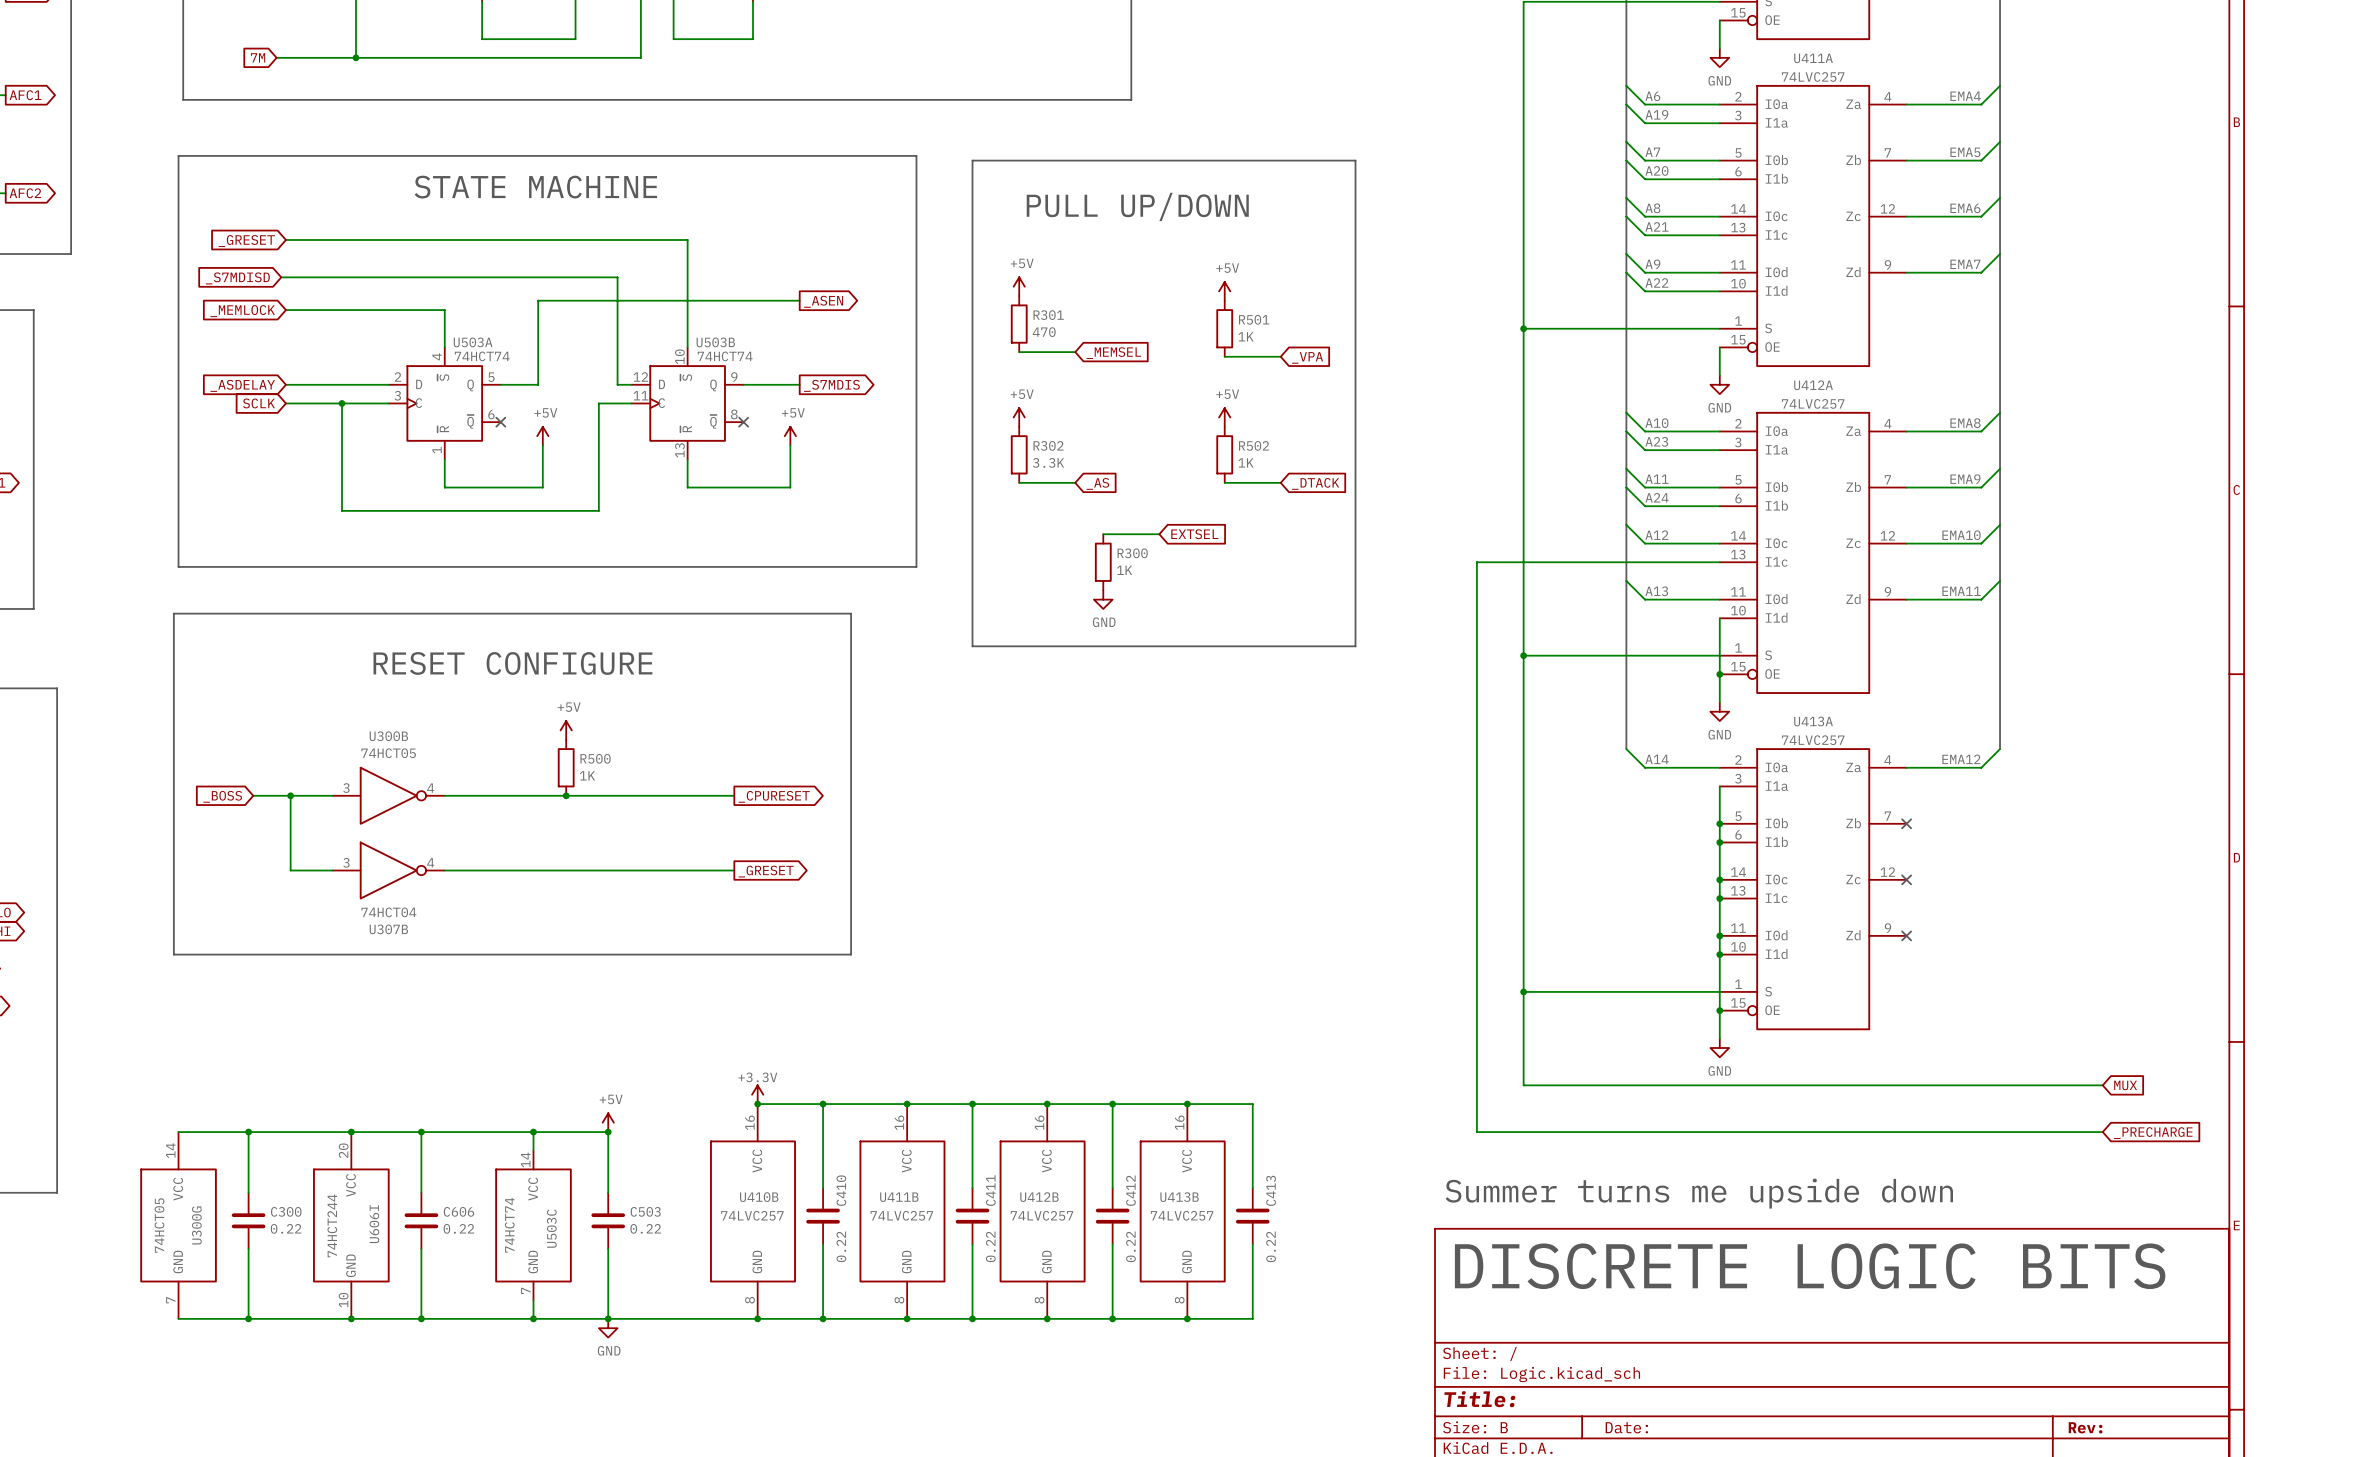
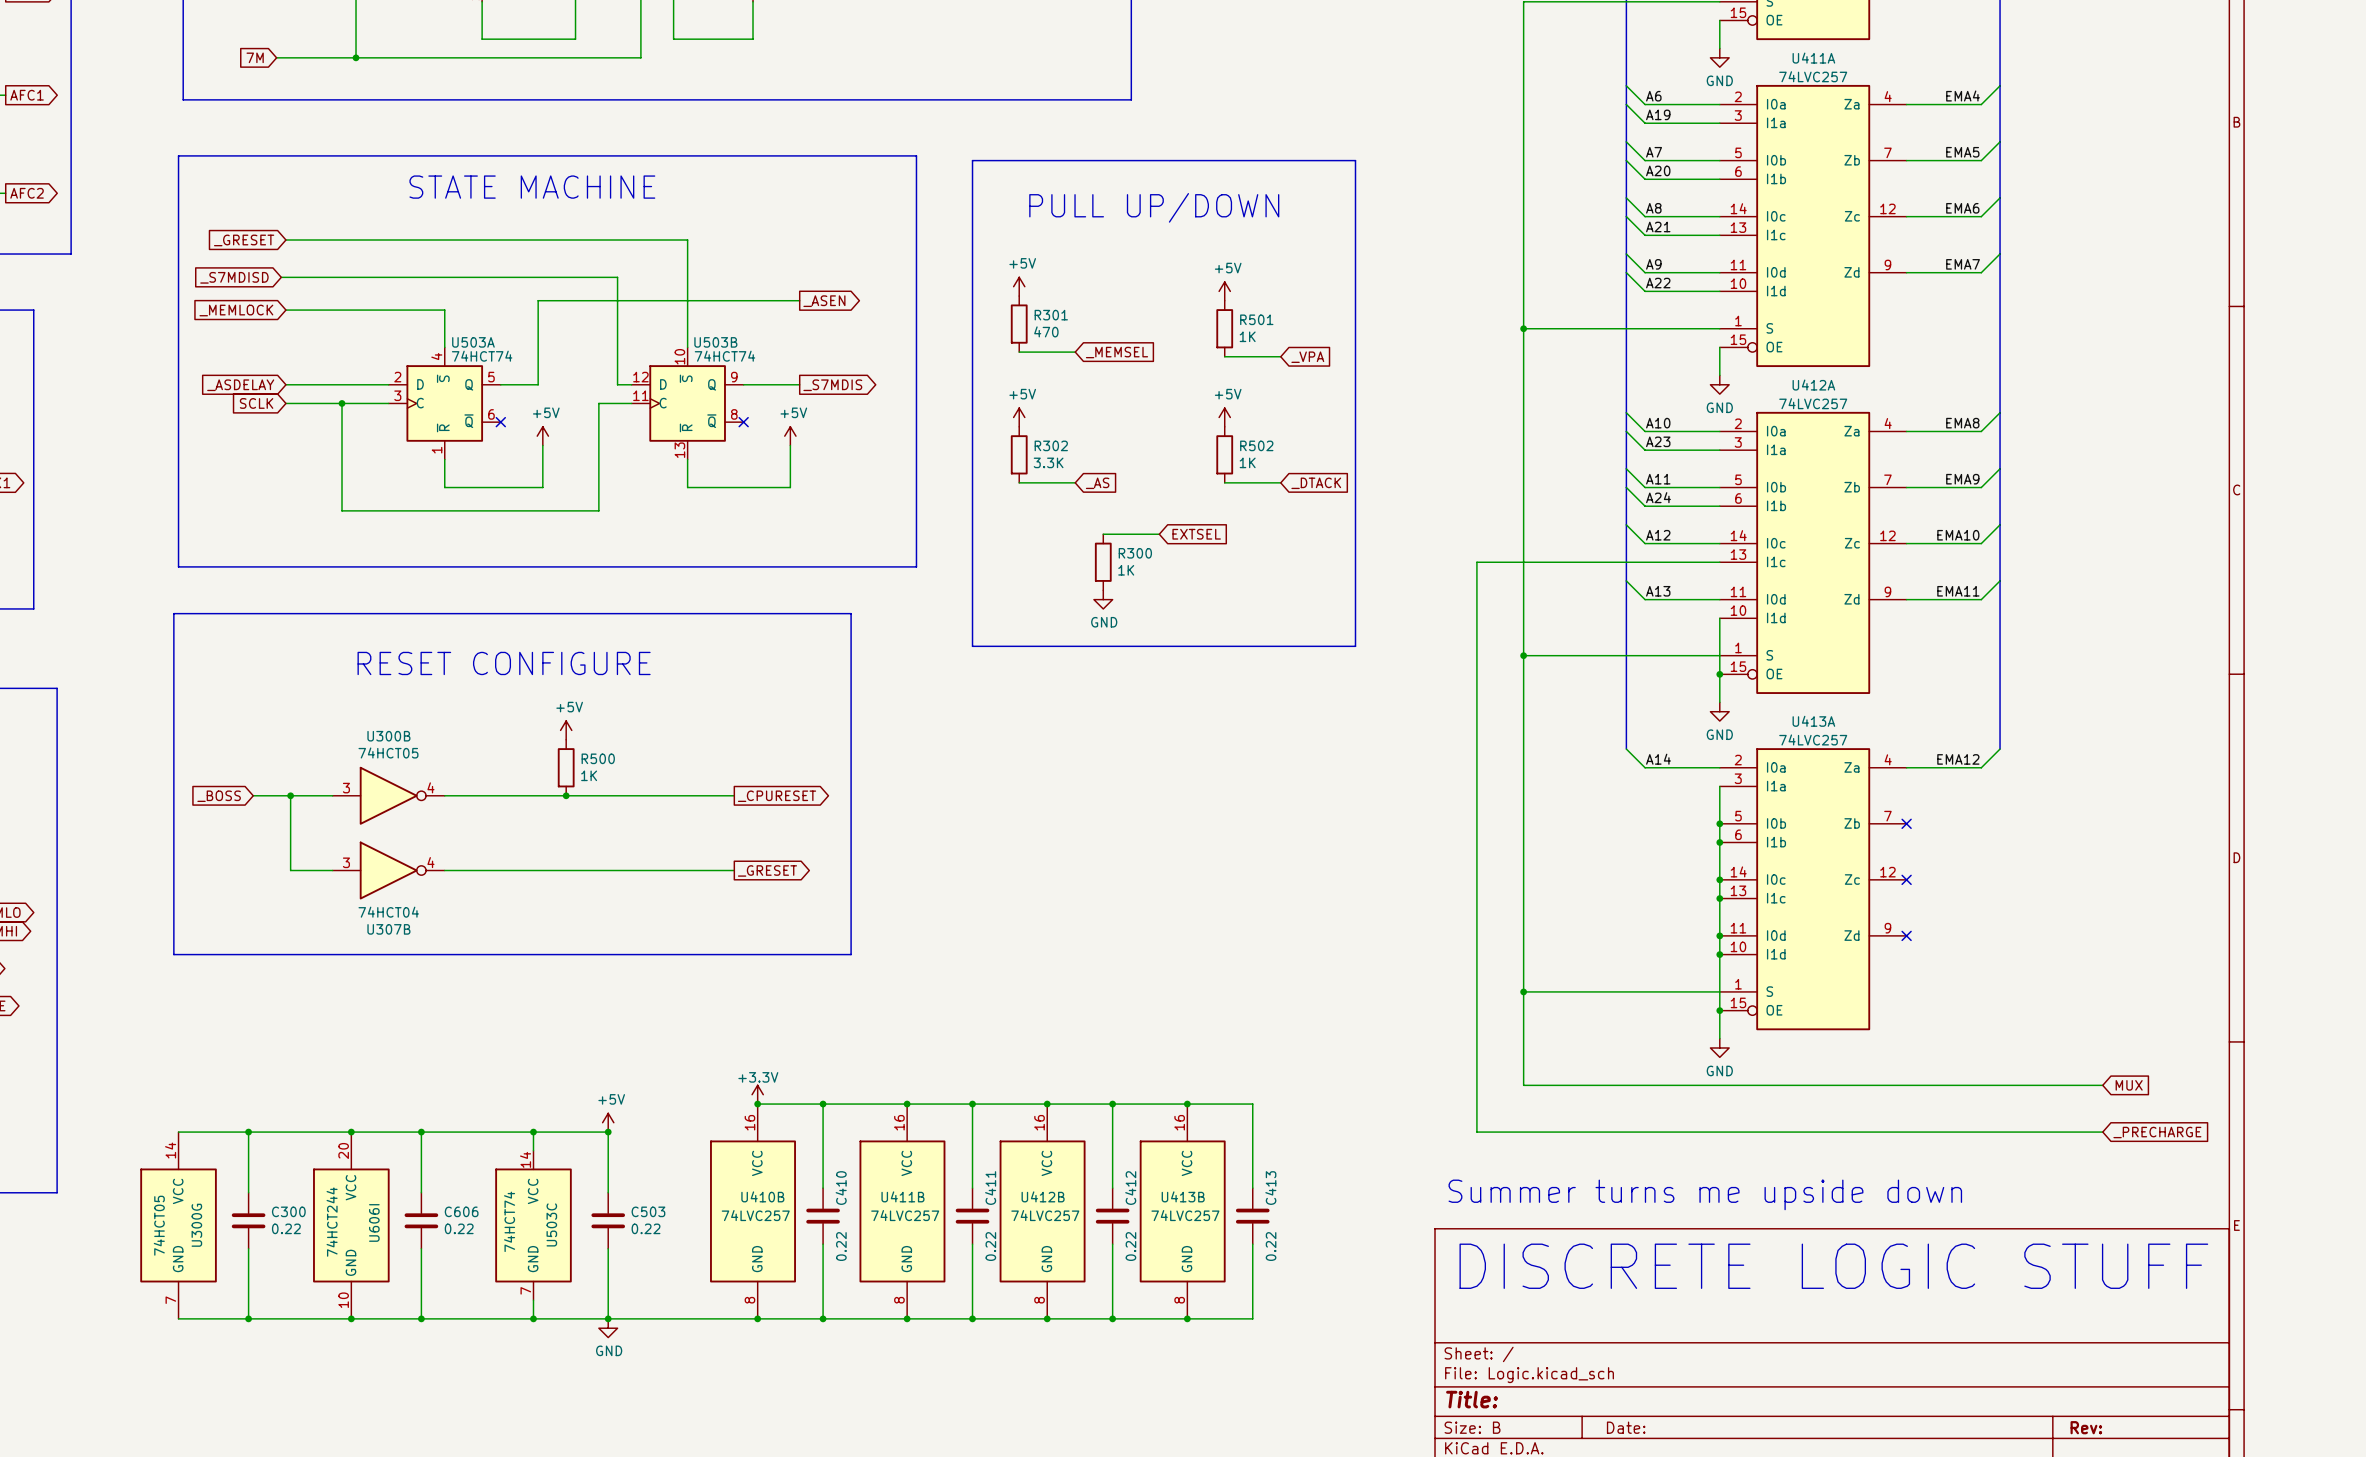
text: DISCRETE LOGIC BITS (1810, 1266) -> DISCRETE LOGIC STUFF (1833, 1266)

